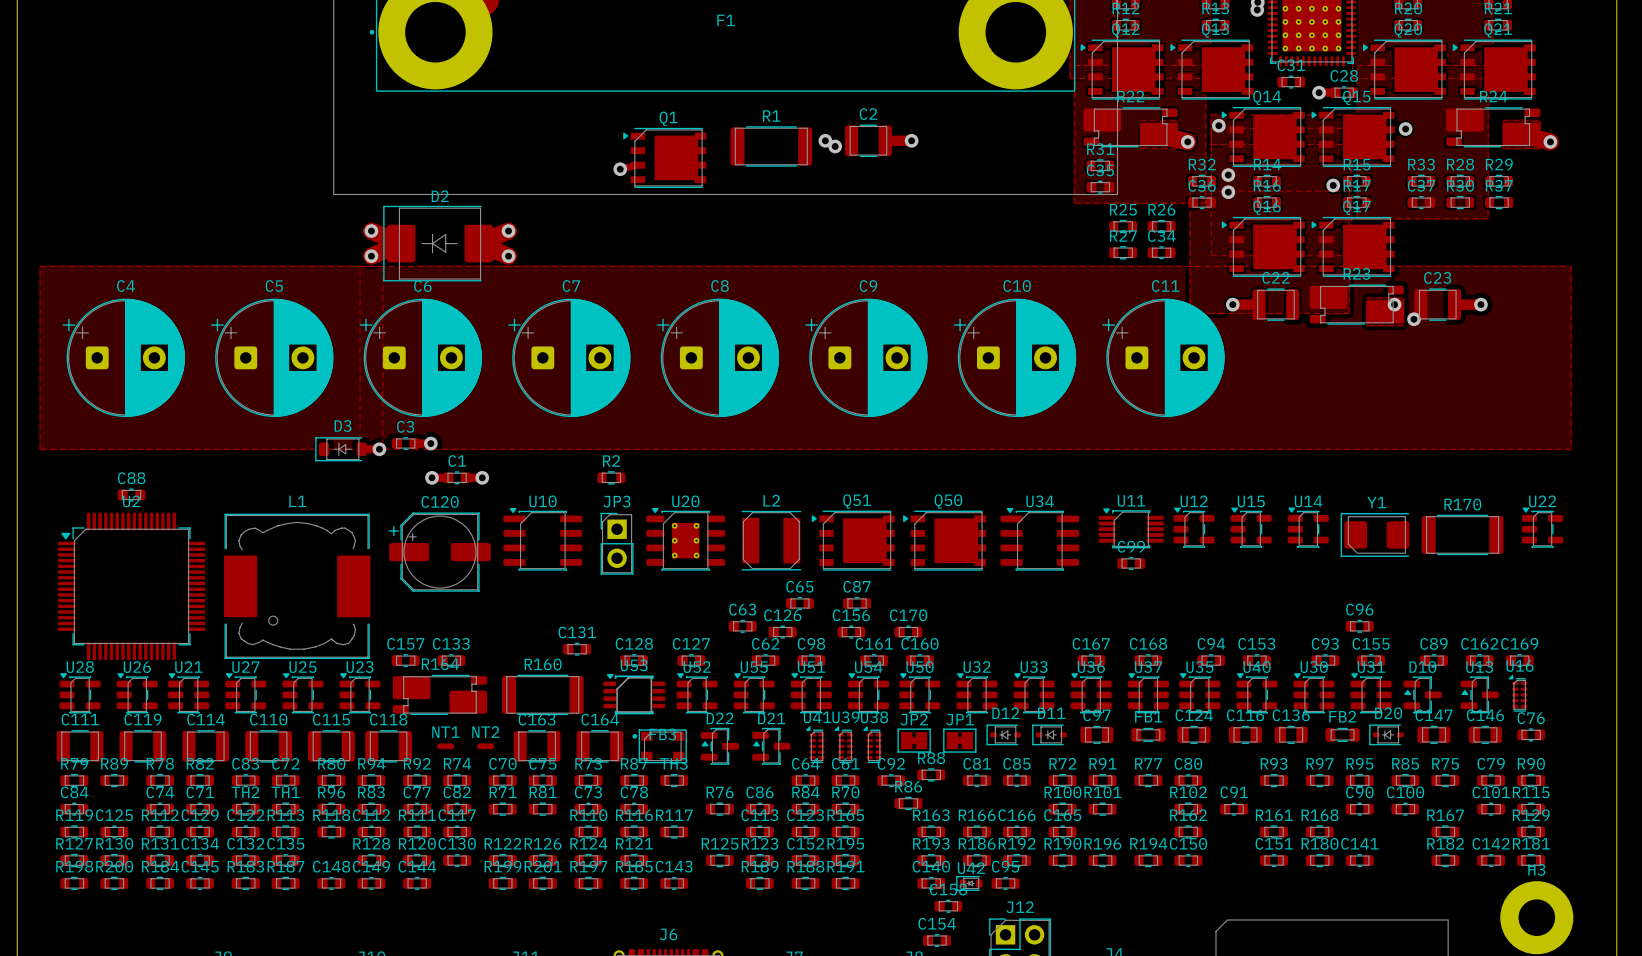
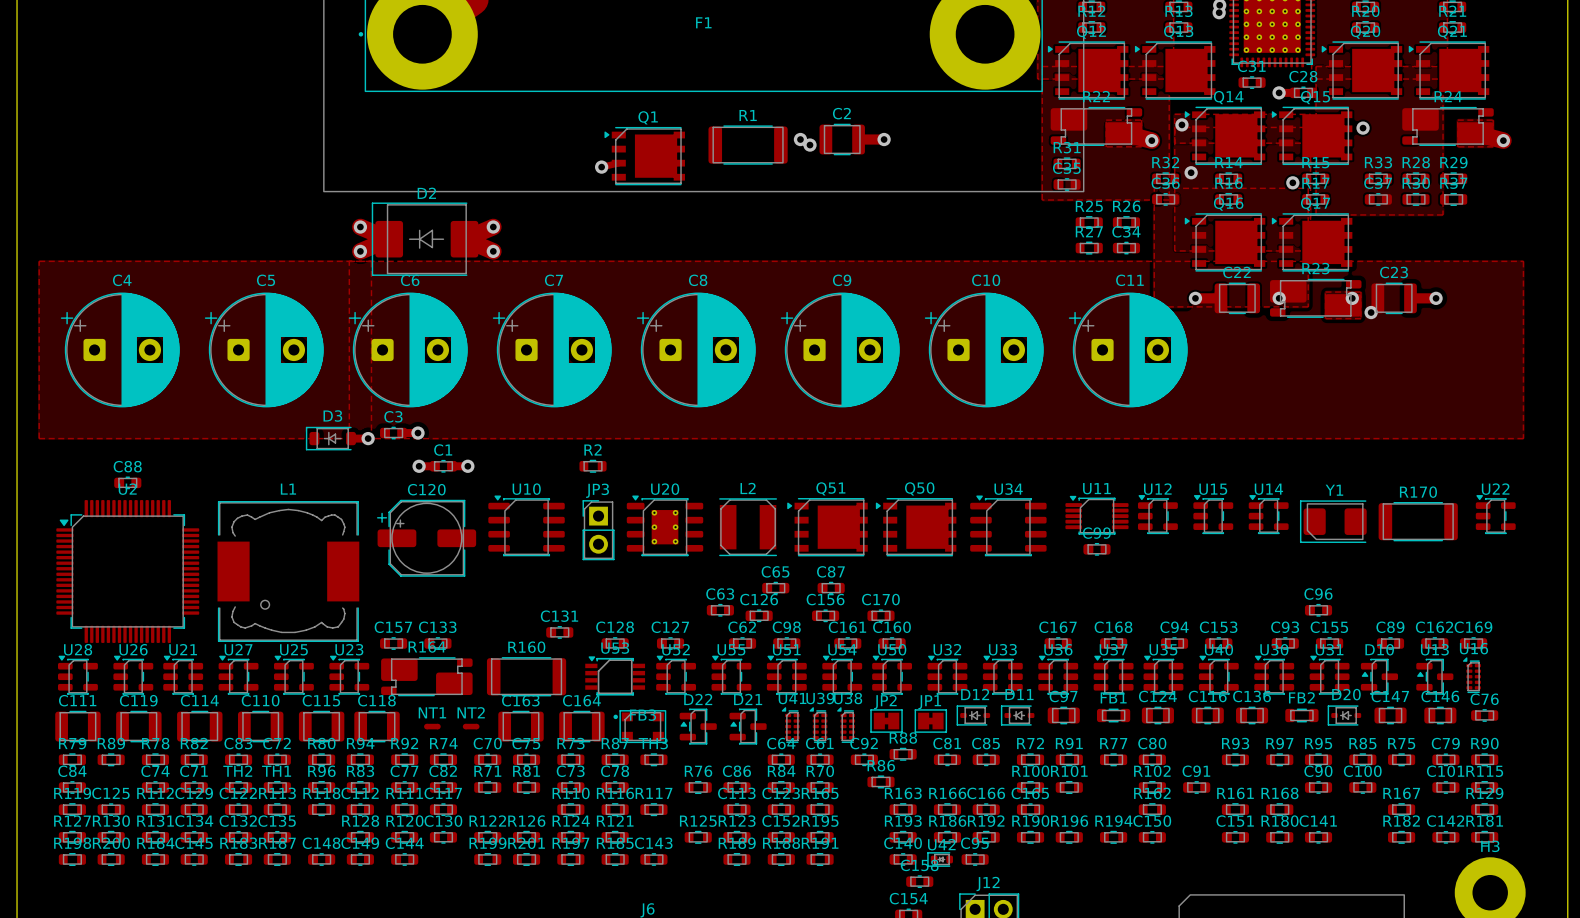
via: (1228, 192) -> none
via: none -> (1279, 298)

